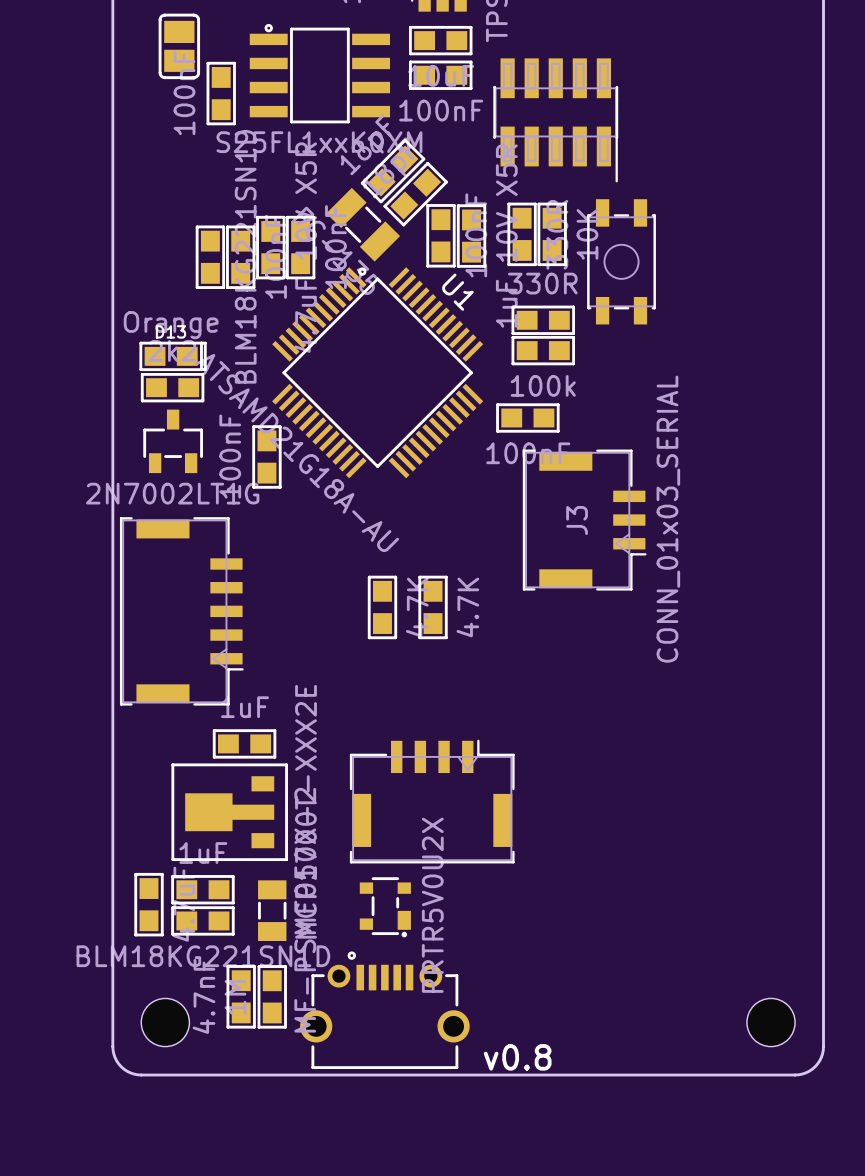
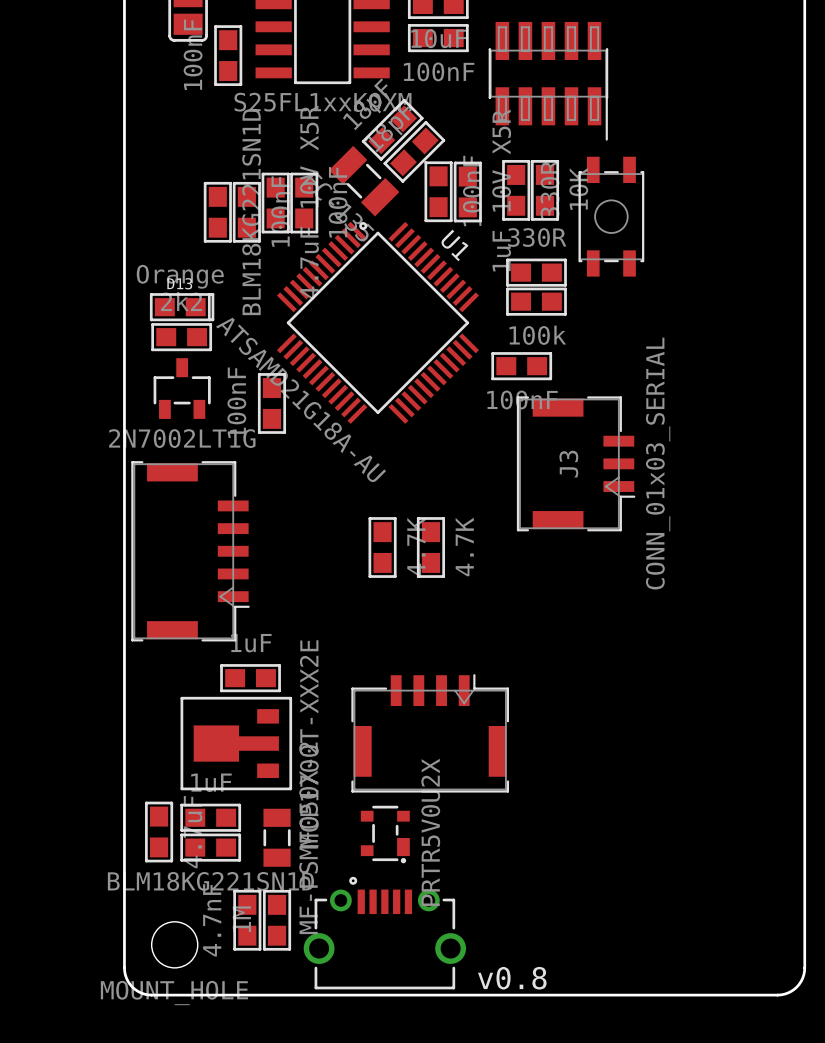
part: (771, 1022) -> none
part value: none -> MOUNT_HOLE (174, 993)

